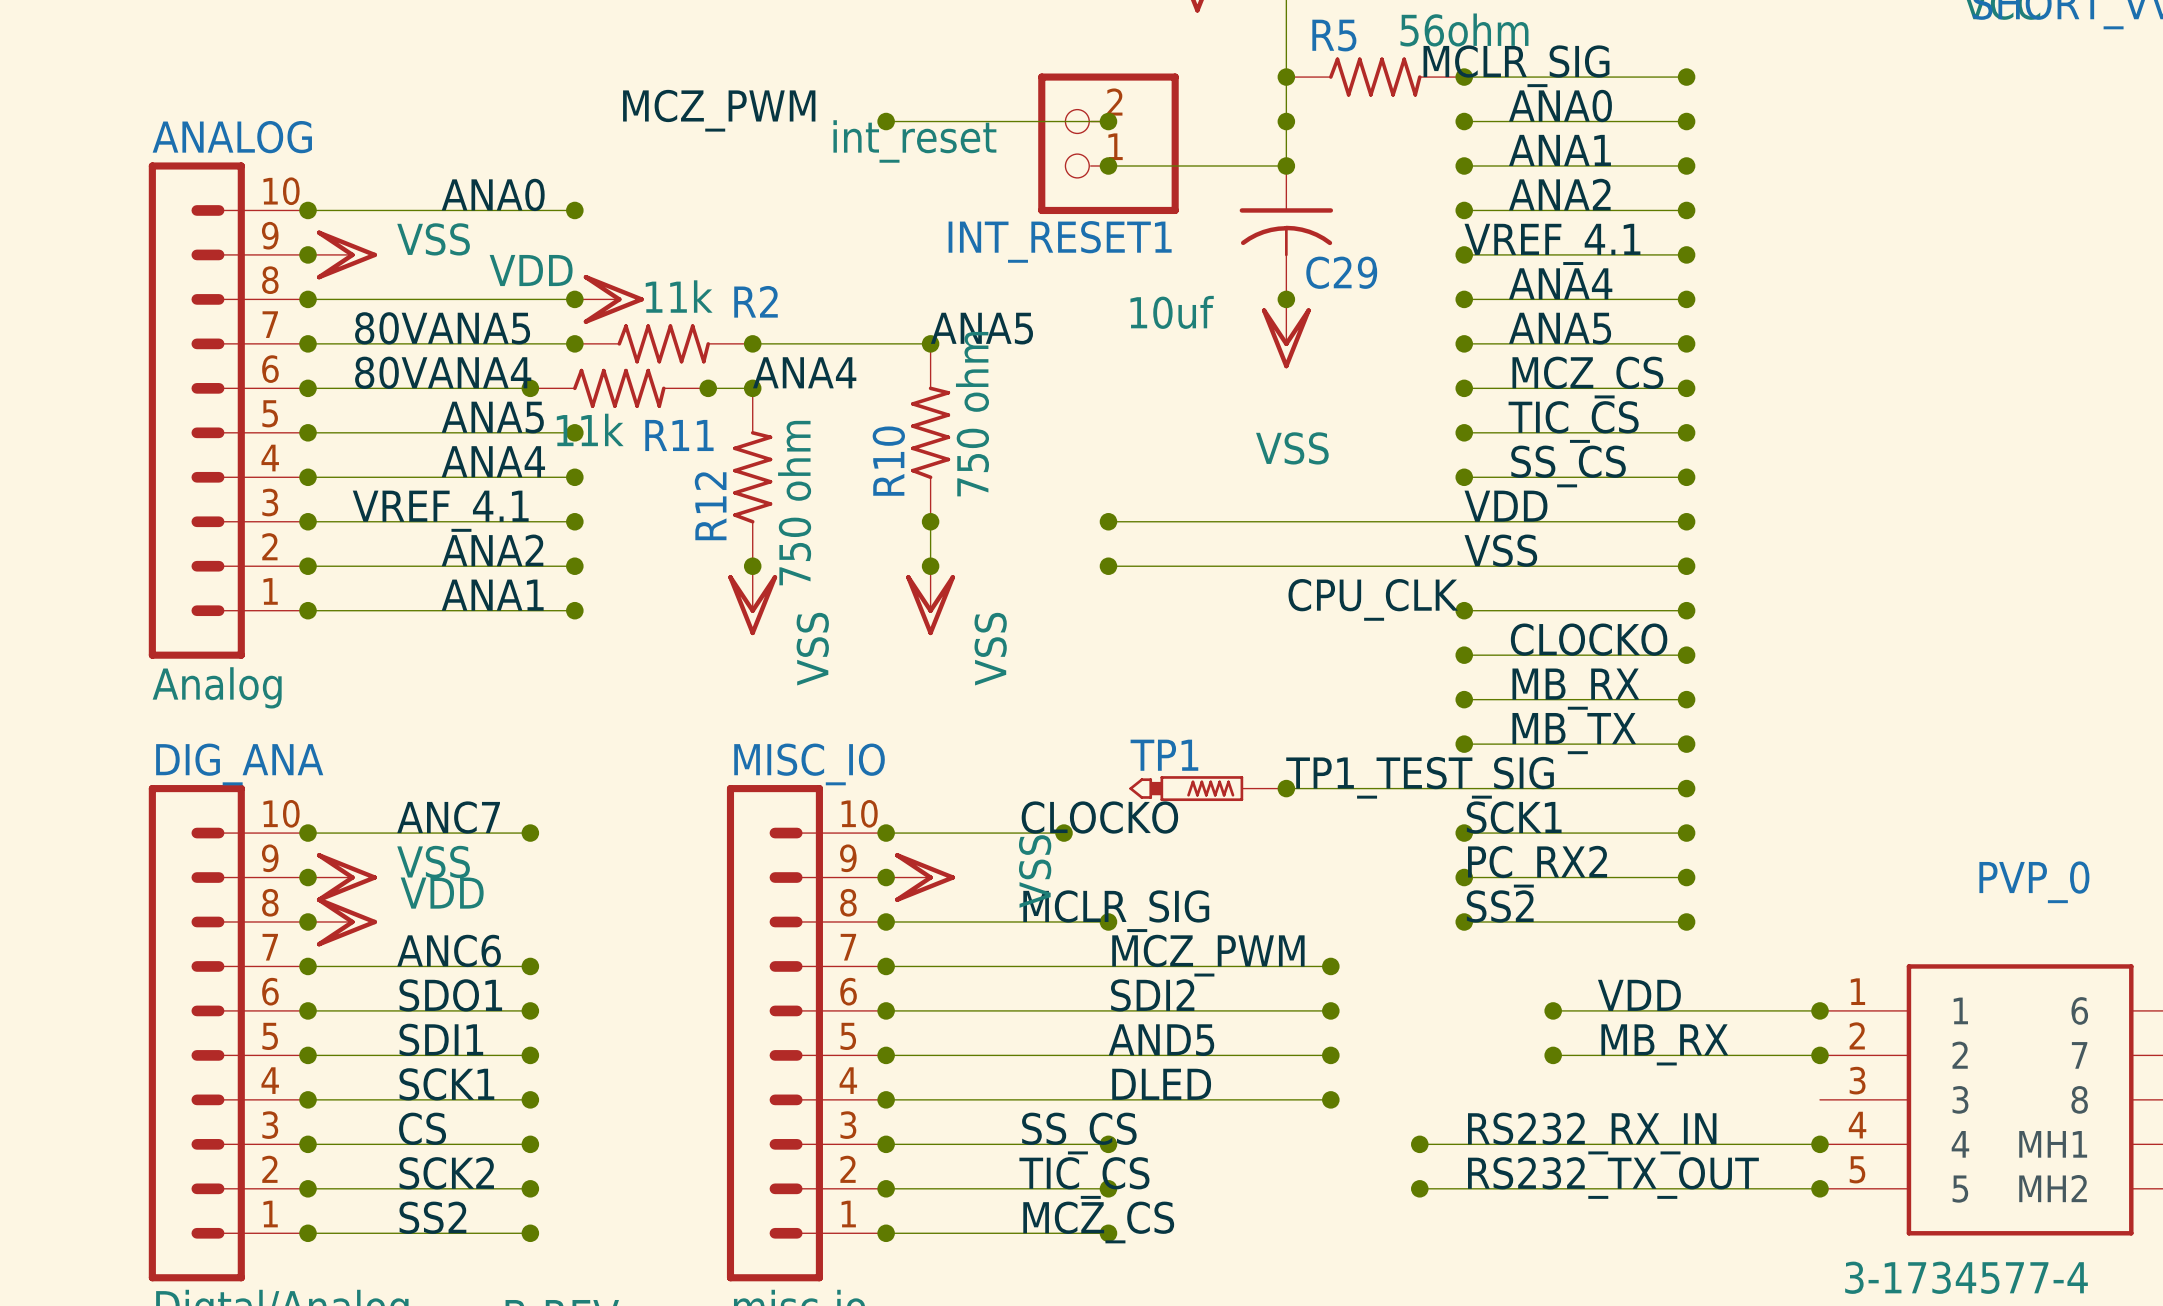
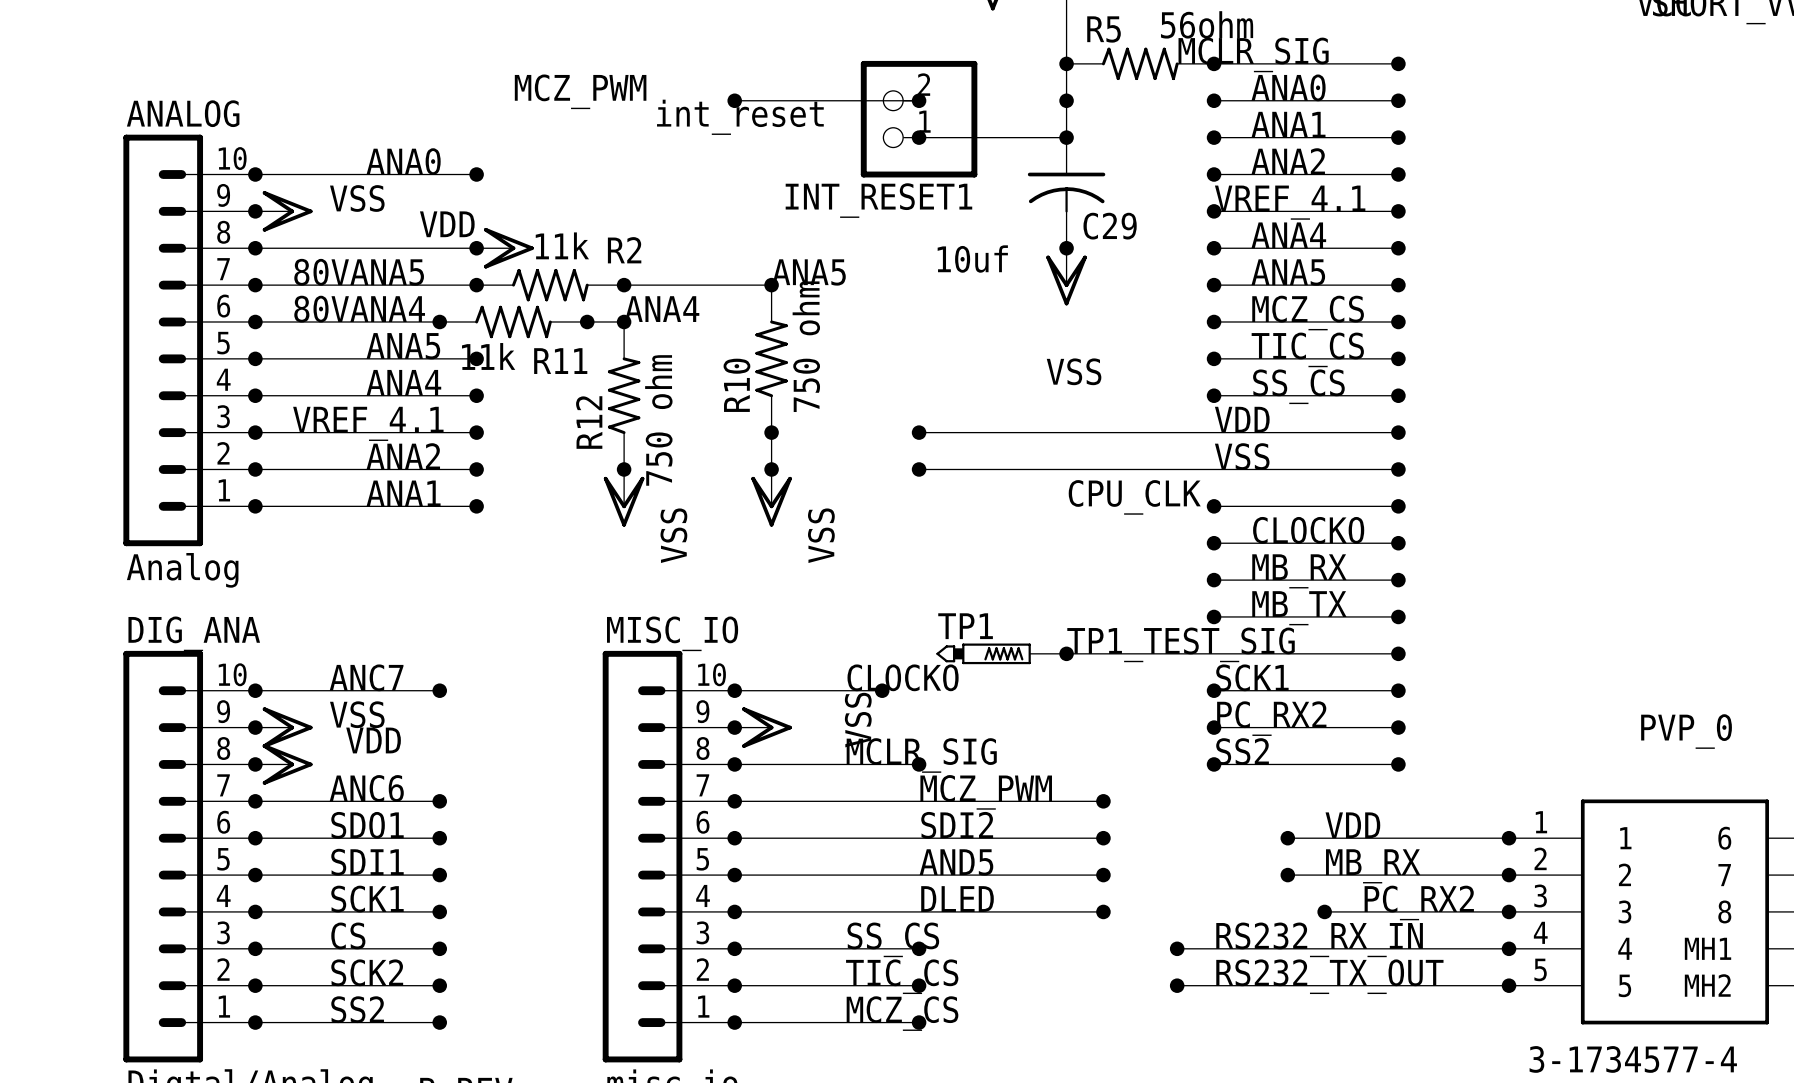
label: none -> PC_RX2 (1419, 902)
wire: none -> (1324, 911) (1509, 911)
junction: none -> (1324, 911)
junction: none -> (1509, 911)

